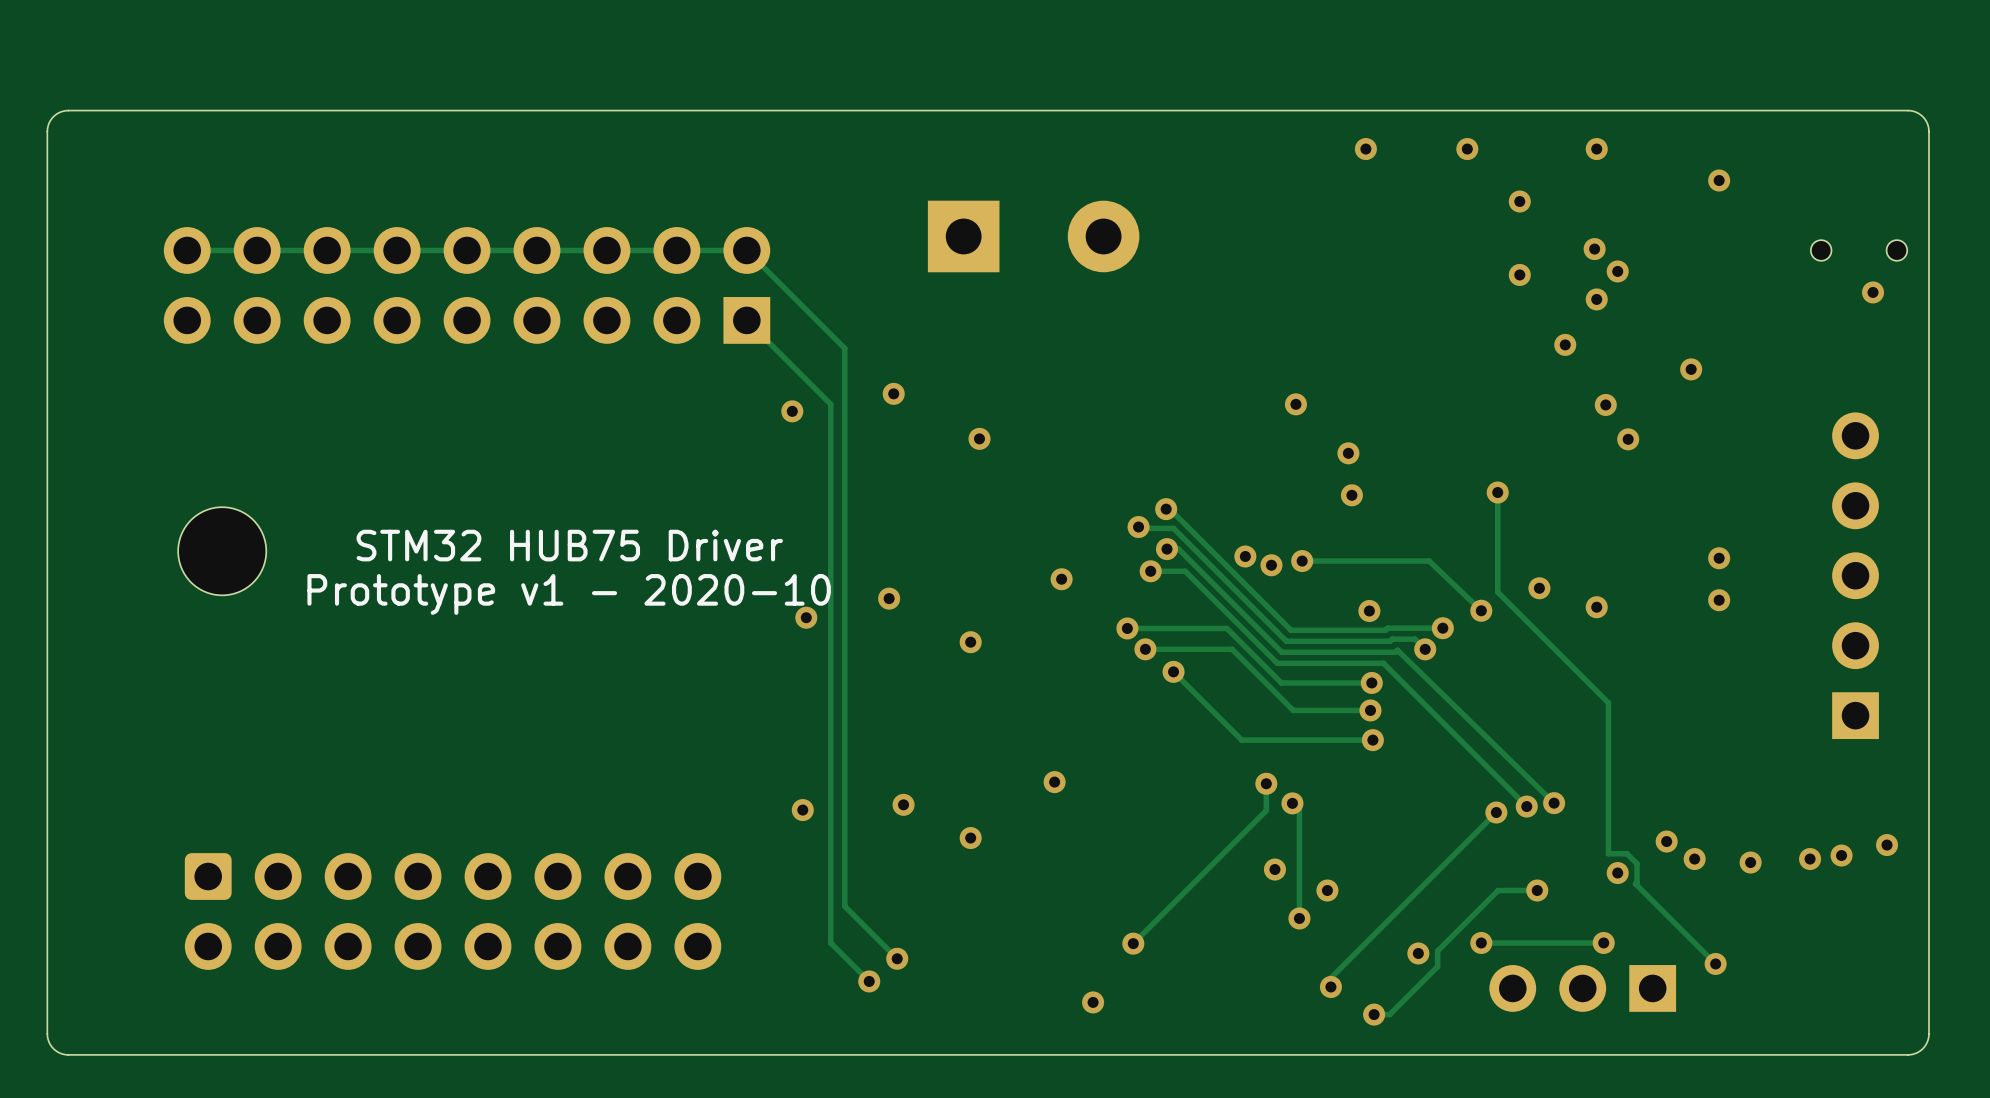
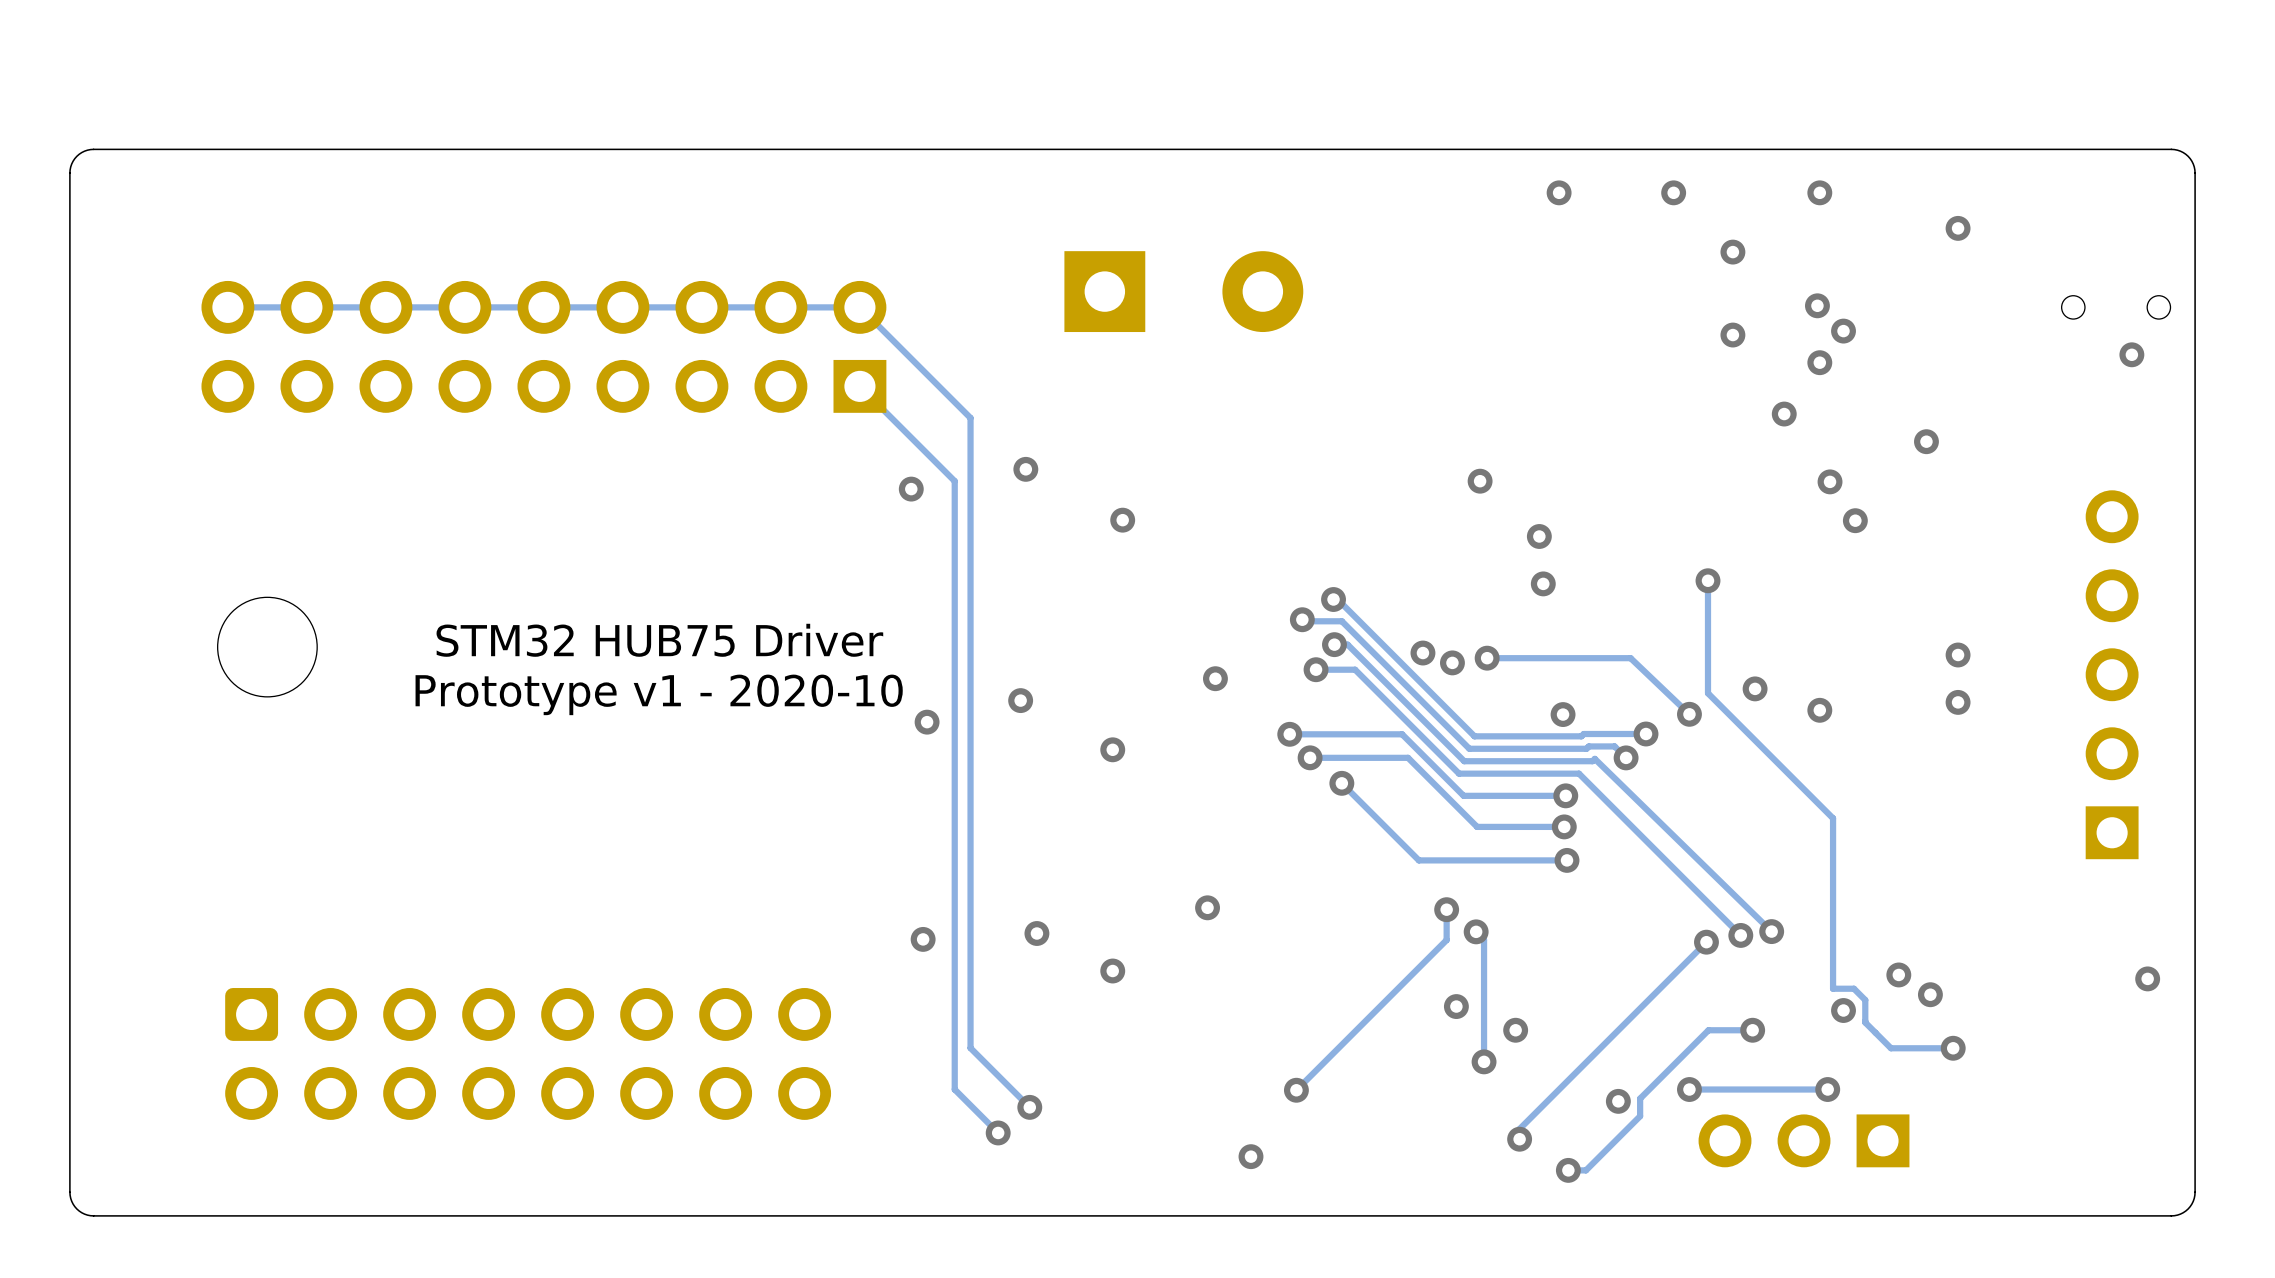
via: (1841, 855) -> none
via: (1810, 859) -> none
via: (1750, 862) -> none
track: (1636, 882) (1635, 883) (1715, 963) -> (1865, 1020) (1891, 1048) (1953, 1048)
via: none -> (1953, 1048)
via: (1715, 963) -> none

